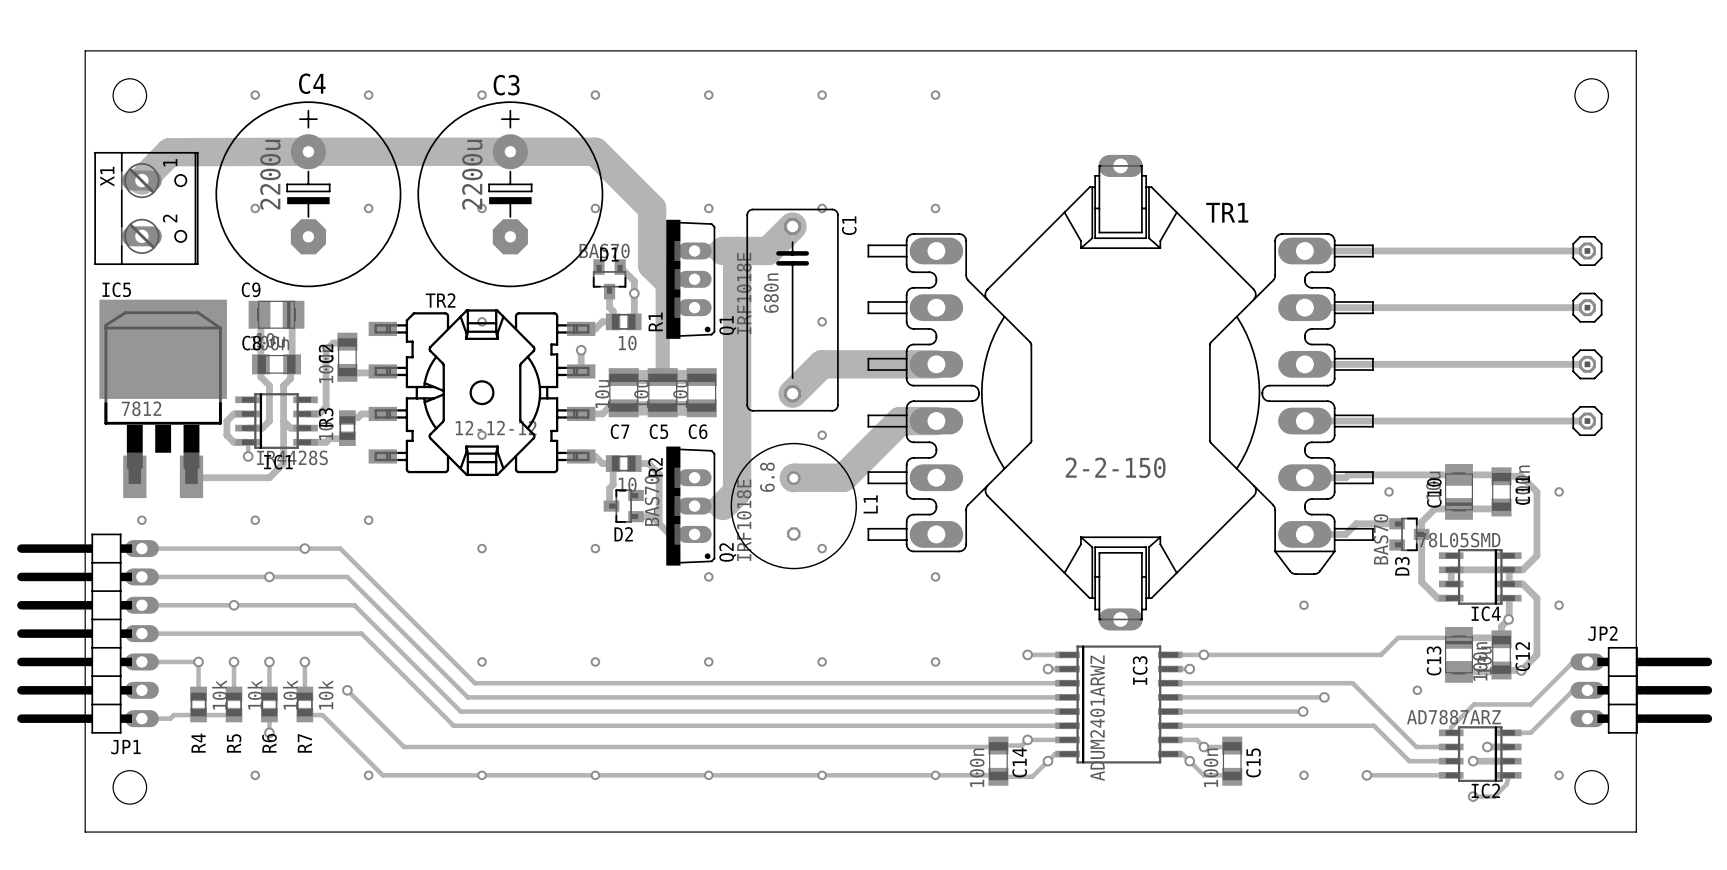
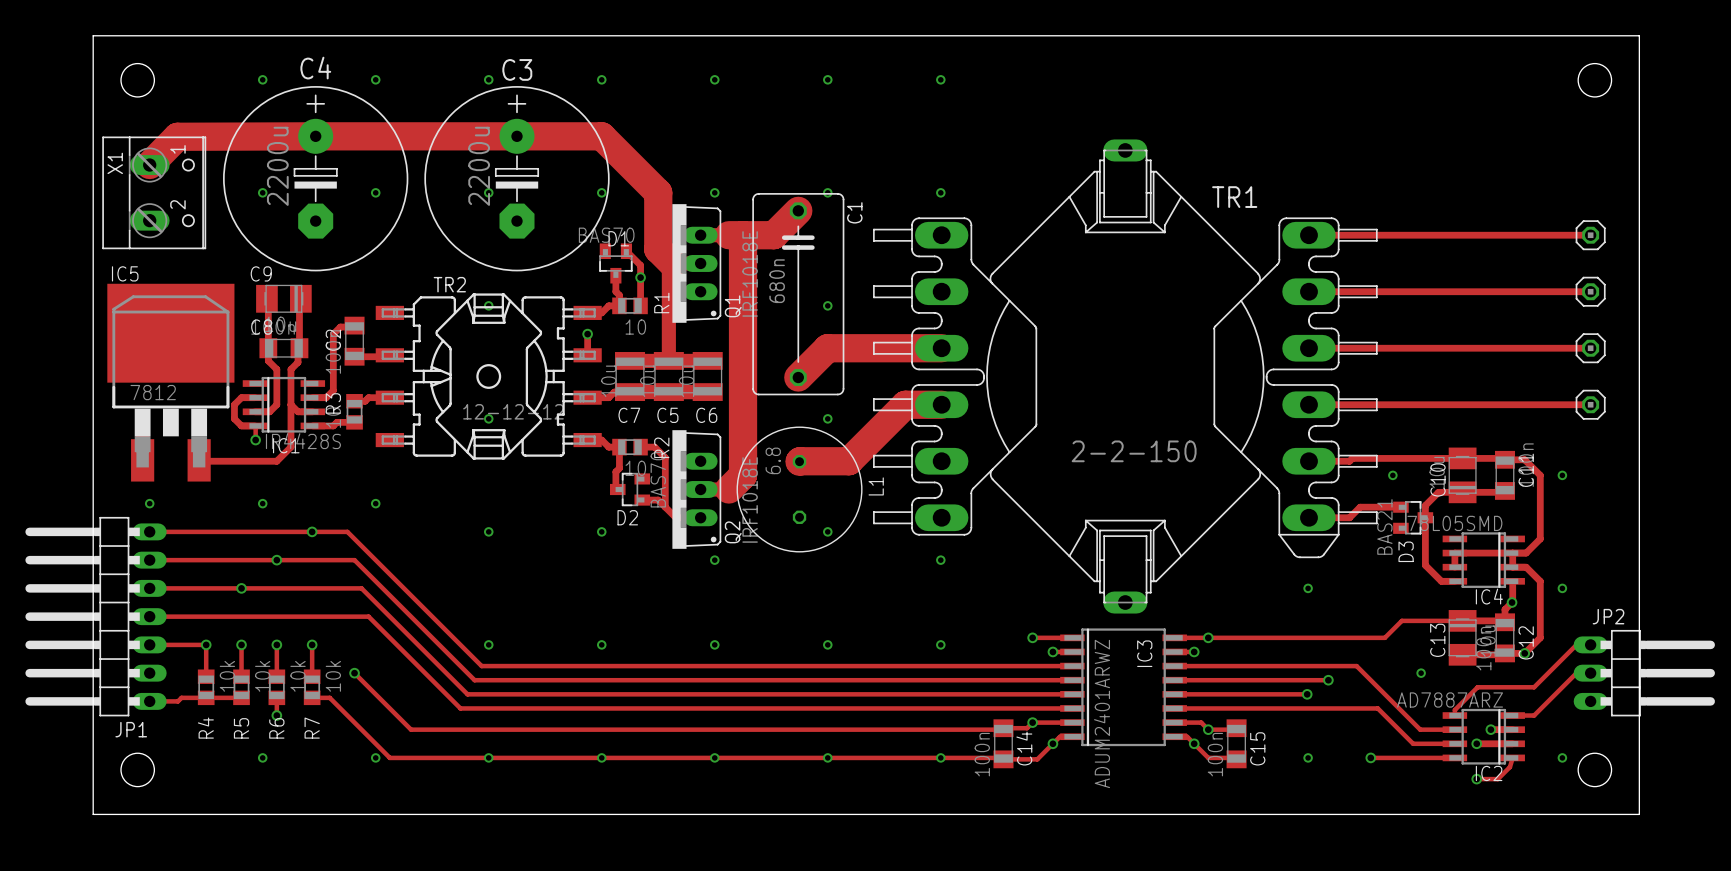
D3 value: BAS70 (1381, 539) -> BAS21 (1384, 526)

